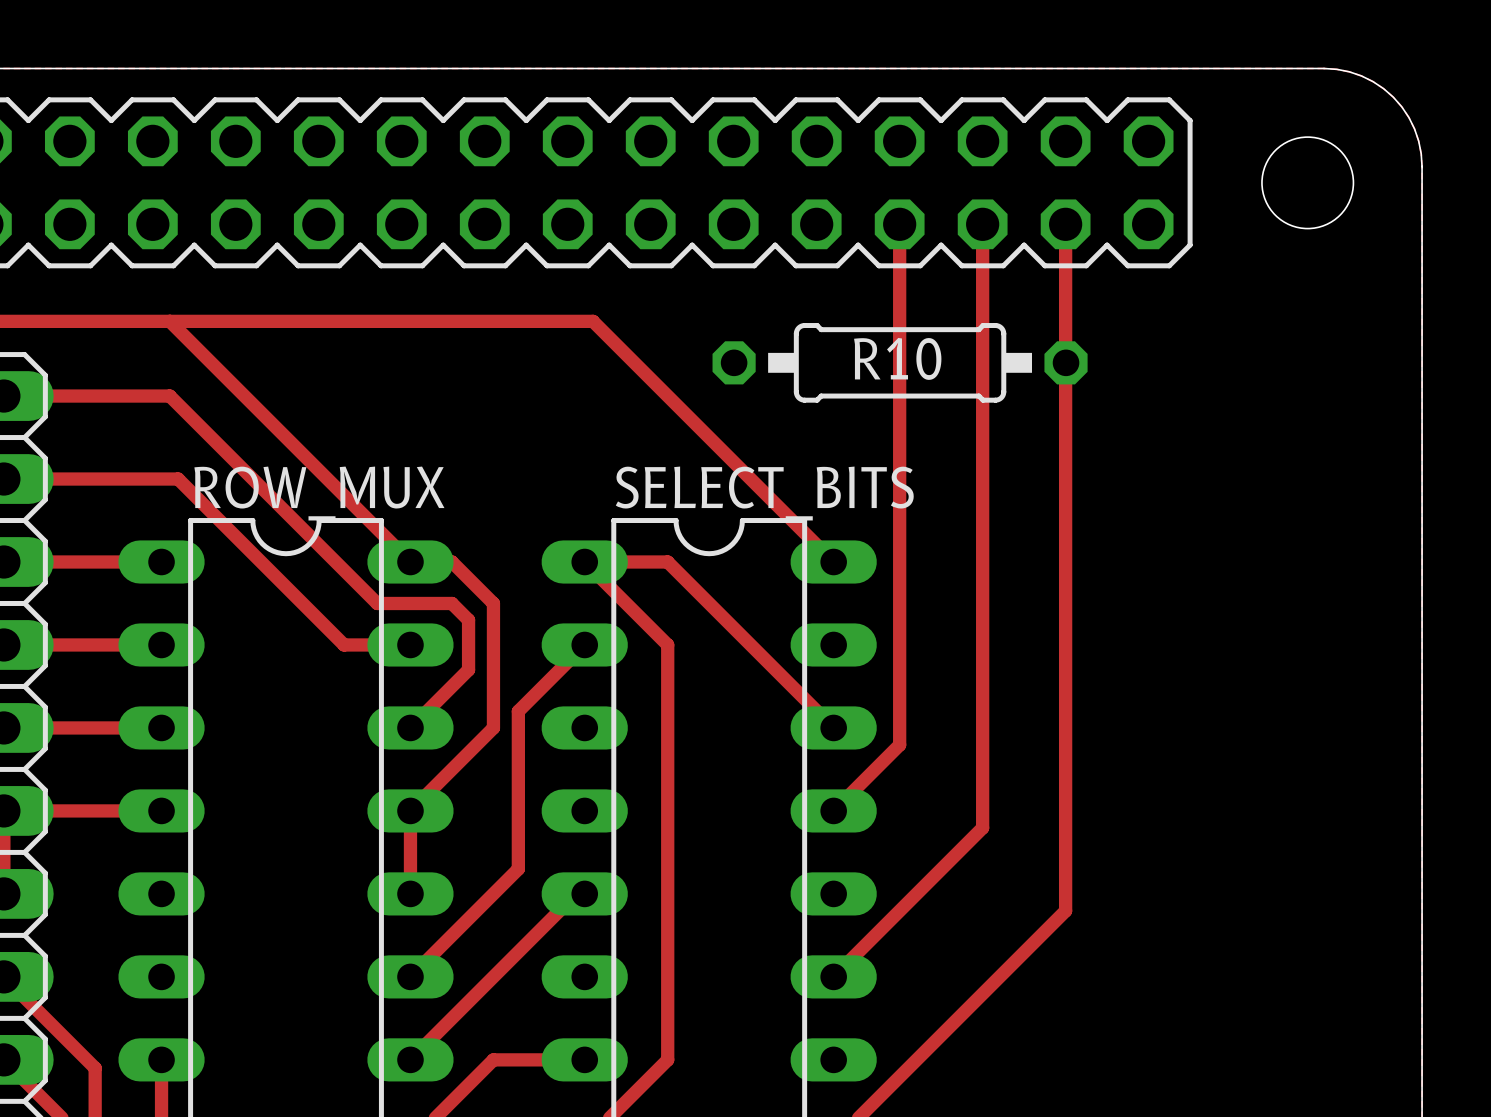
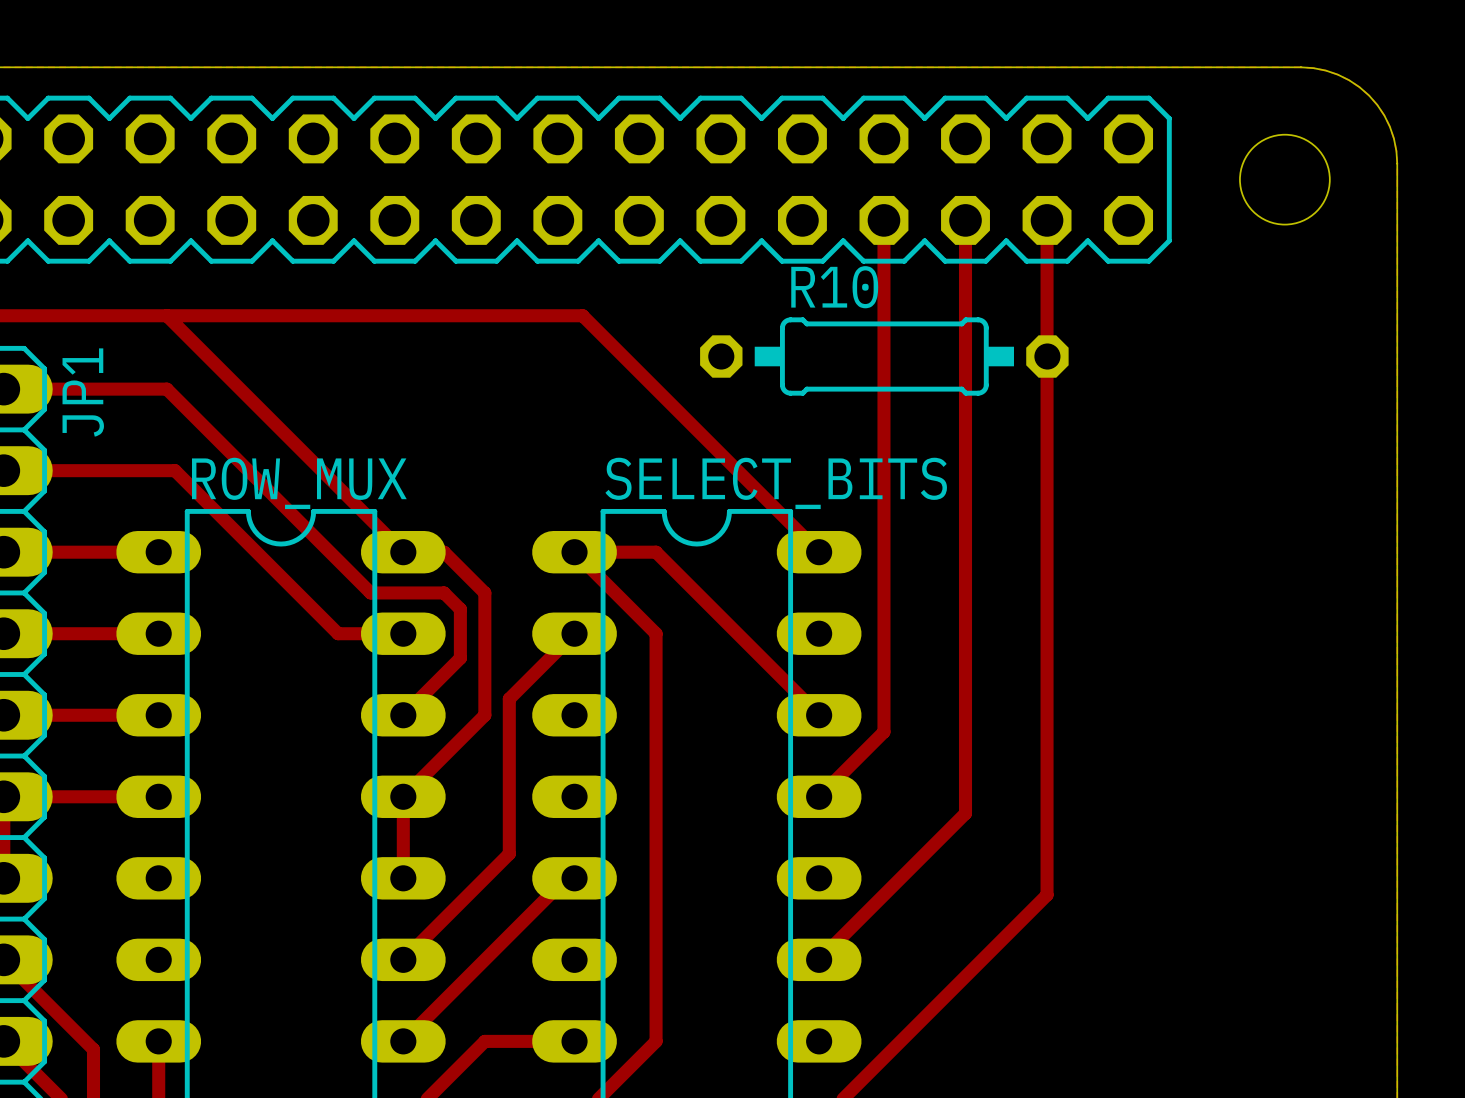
R10 name position: R10 (897, 358) -> R10 (834, 287)
JP1 name: none -> JP1 (83, 392)

